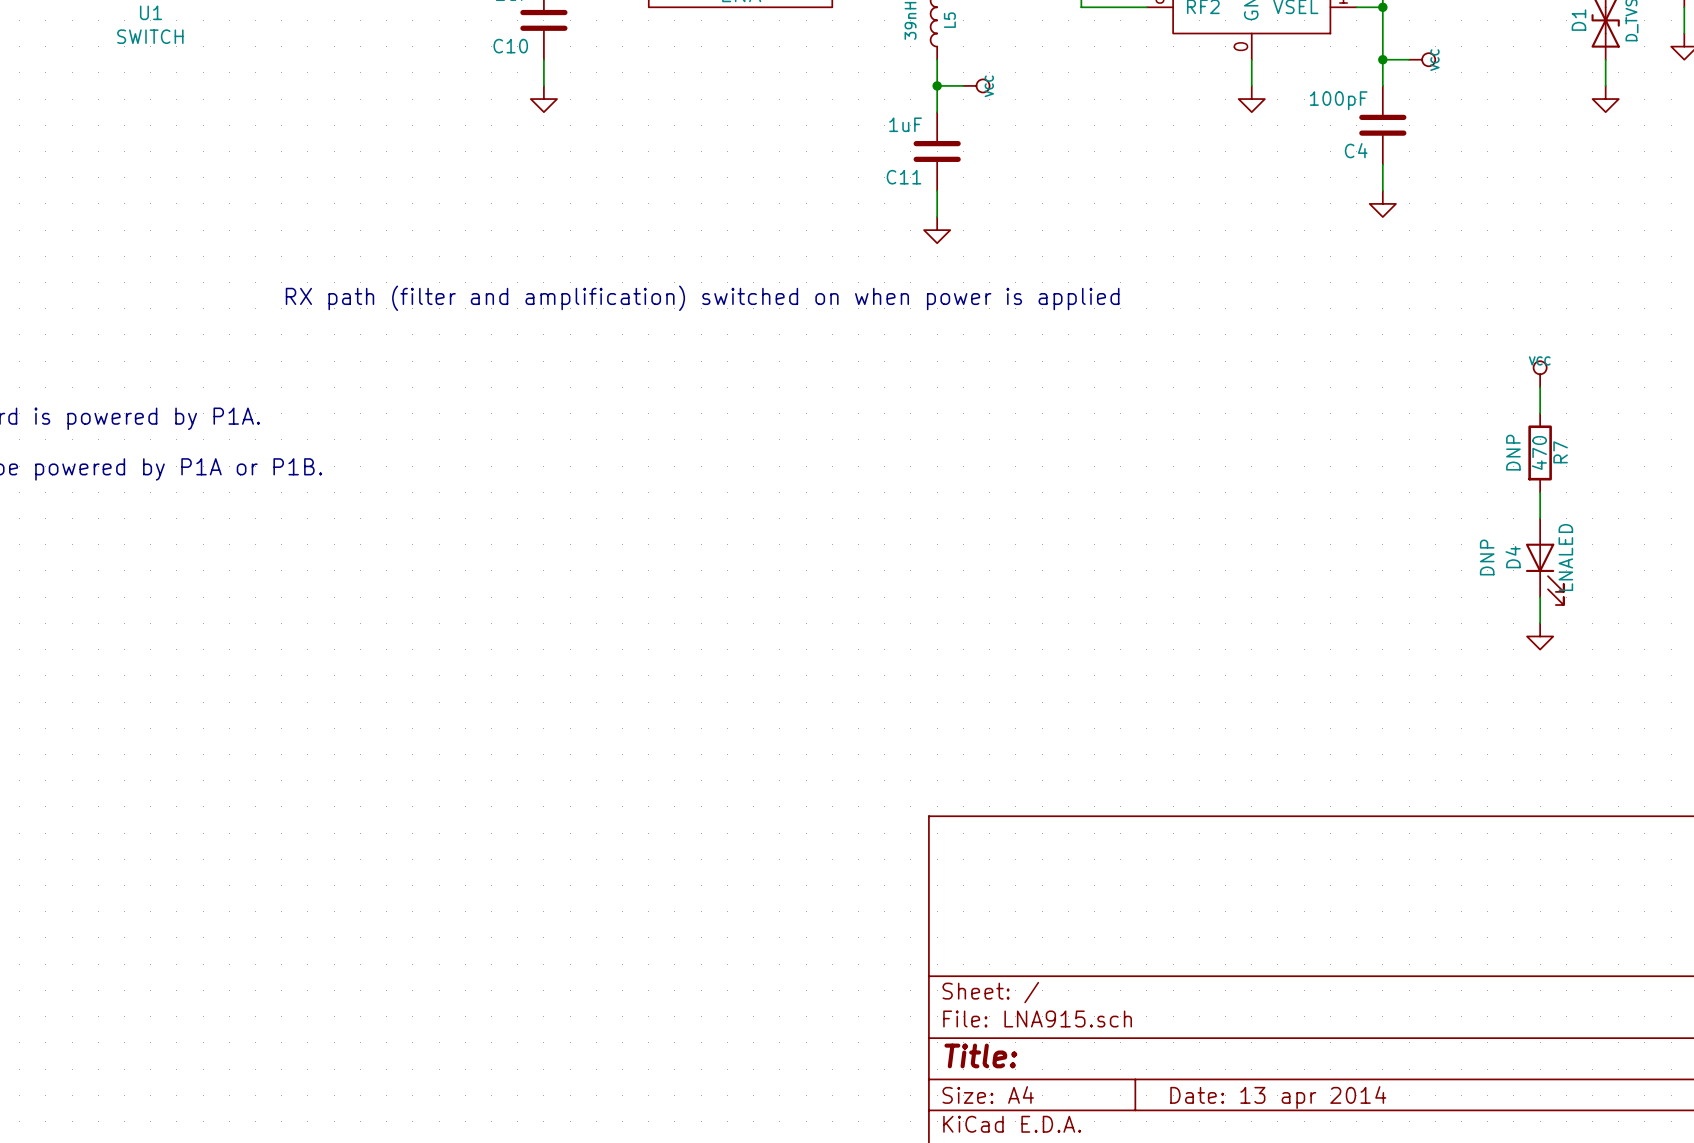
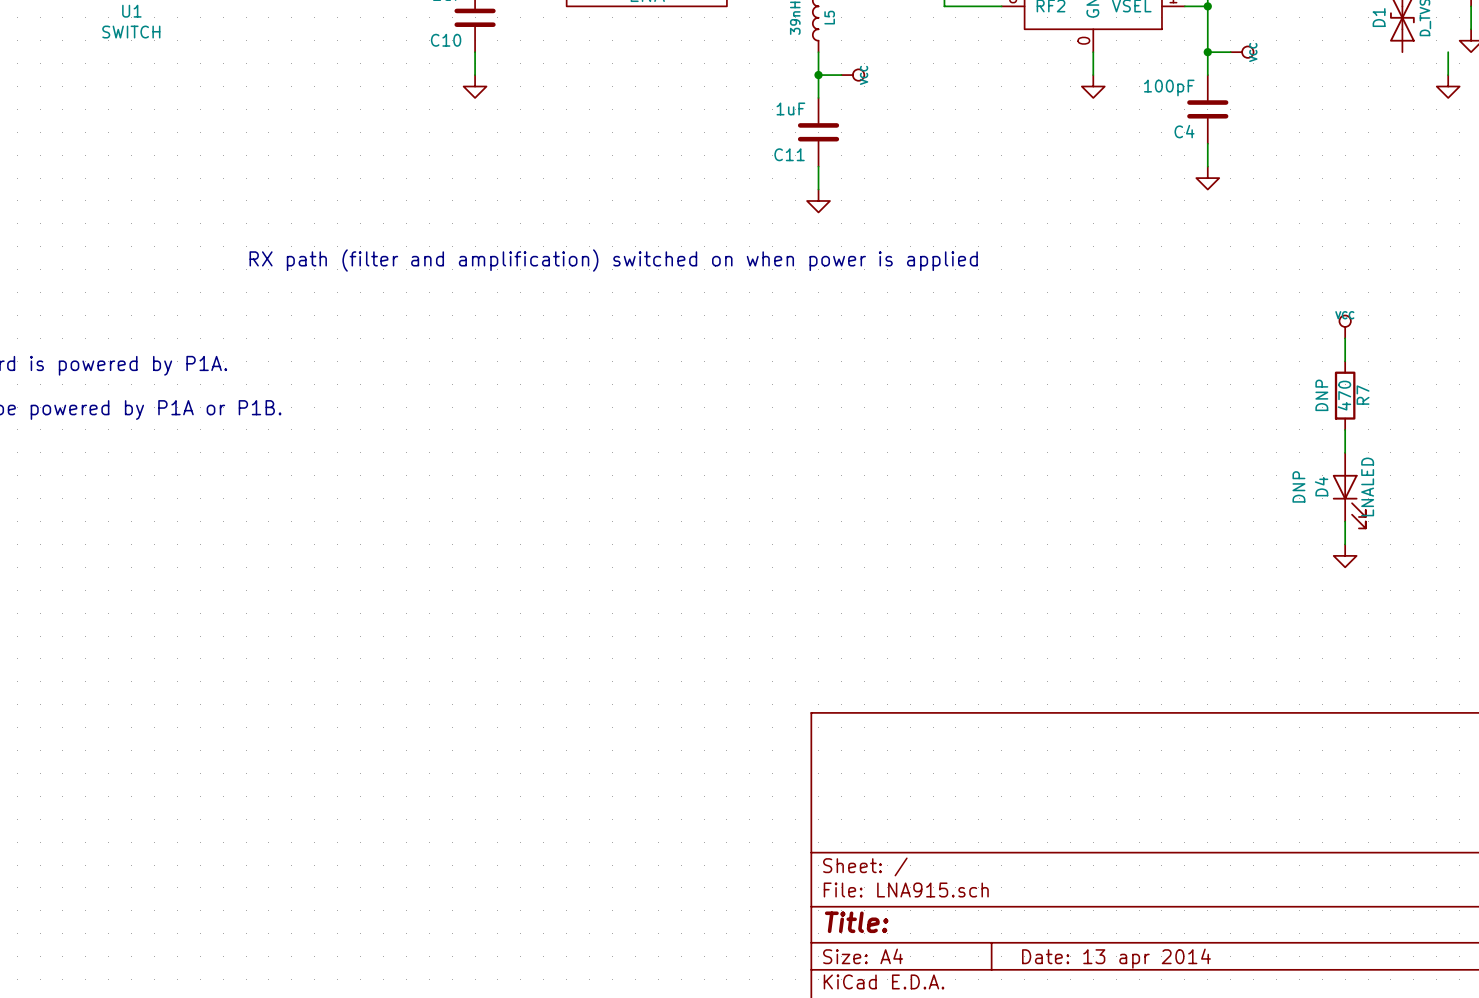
wire: (1605, 59) (1605, 85) -> (1448, 52) (1448, 75)
power symbol position: (1605, 99) -> (1448, 86)

